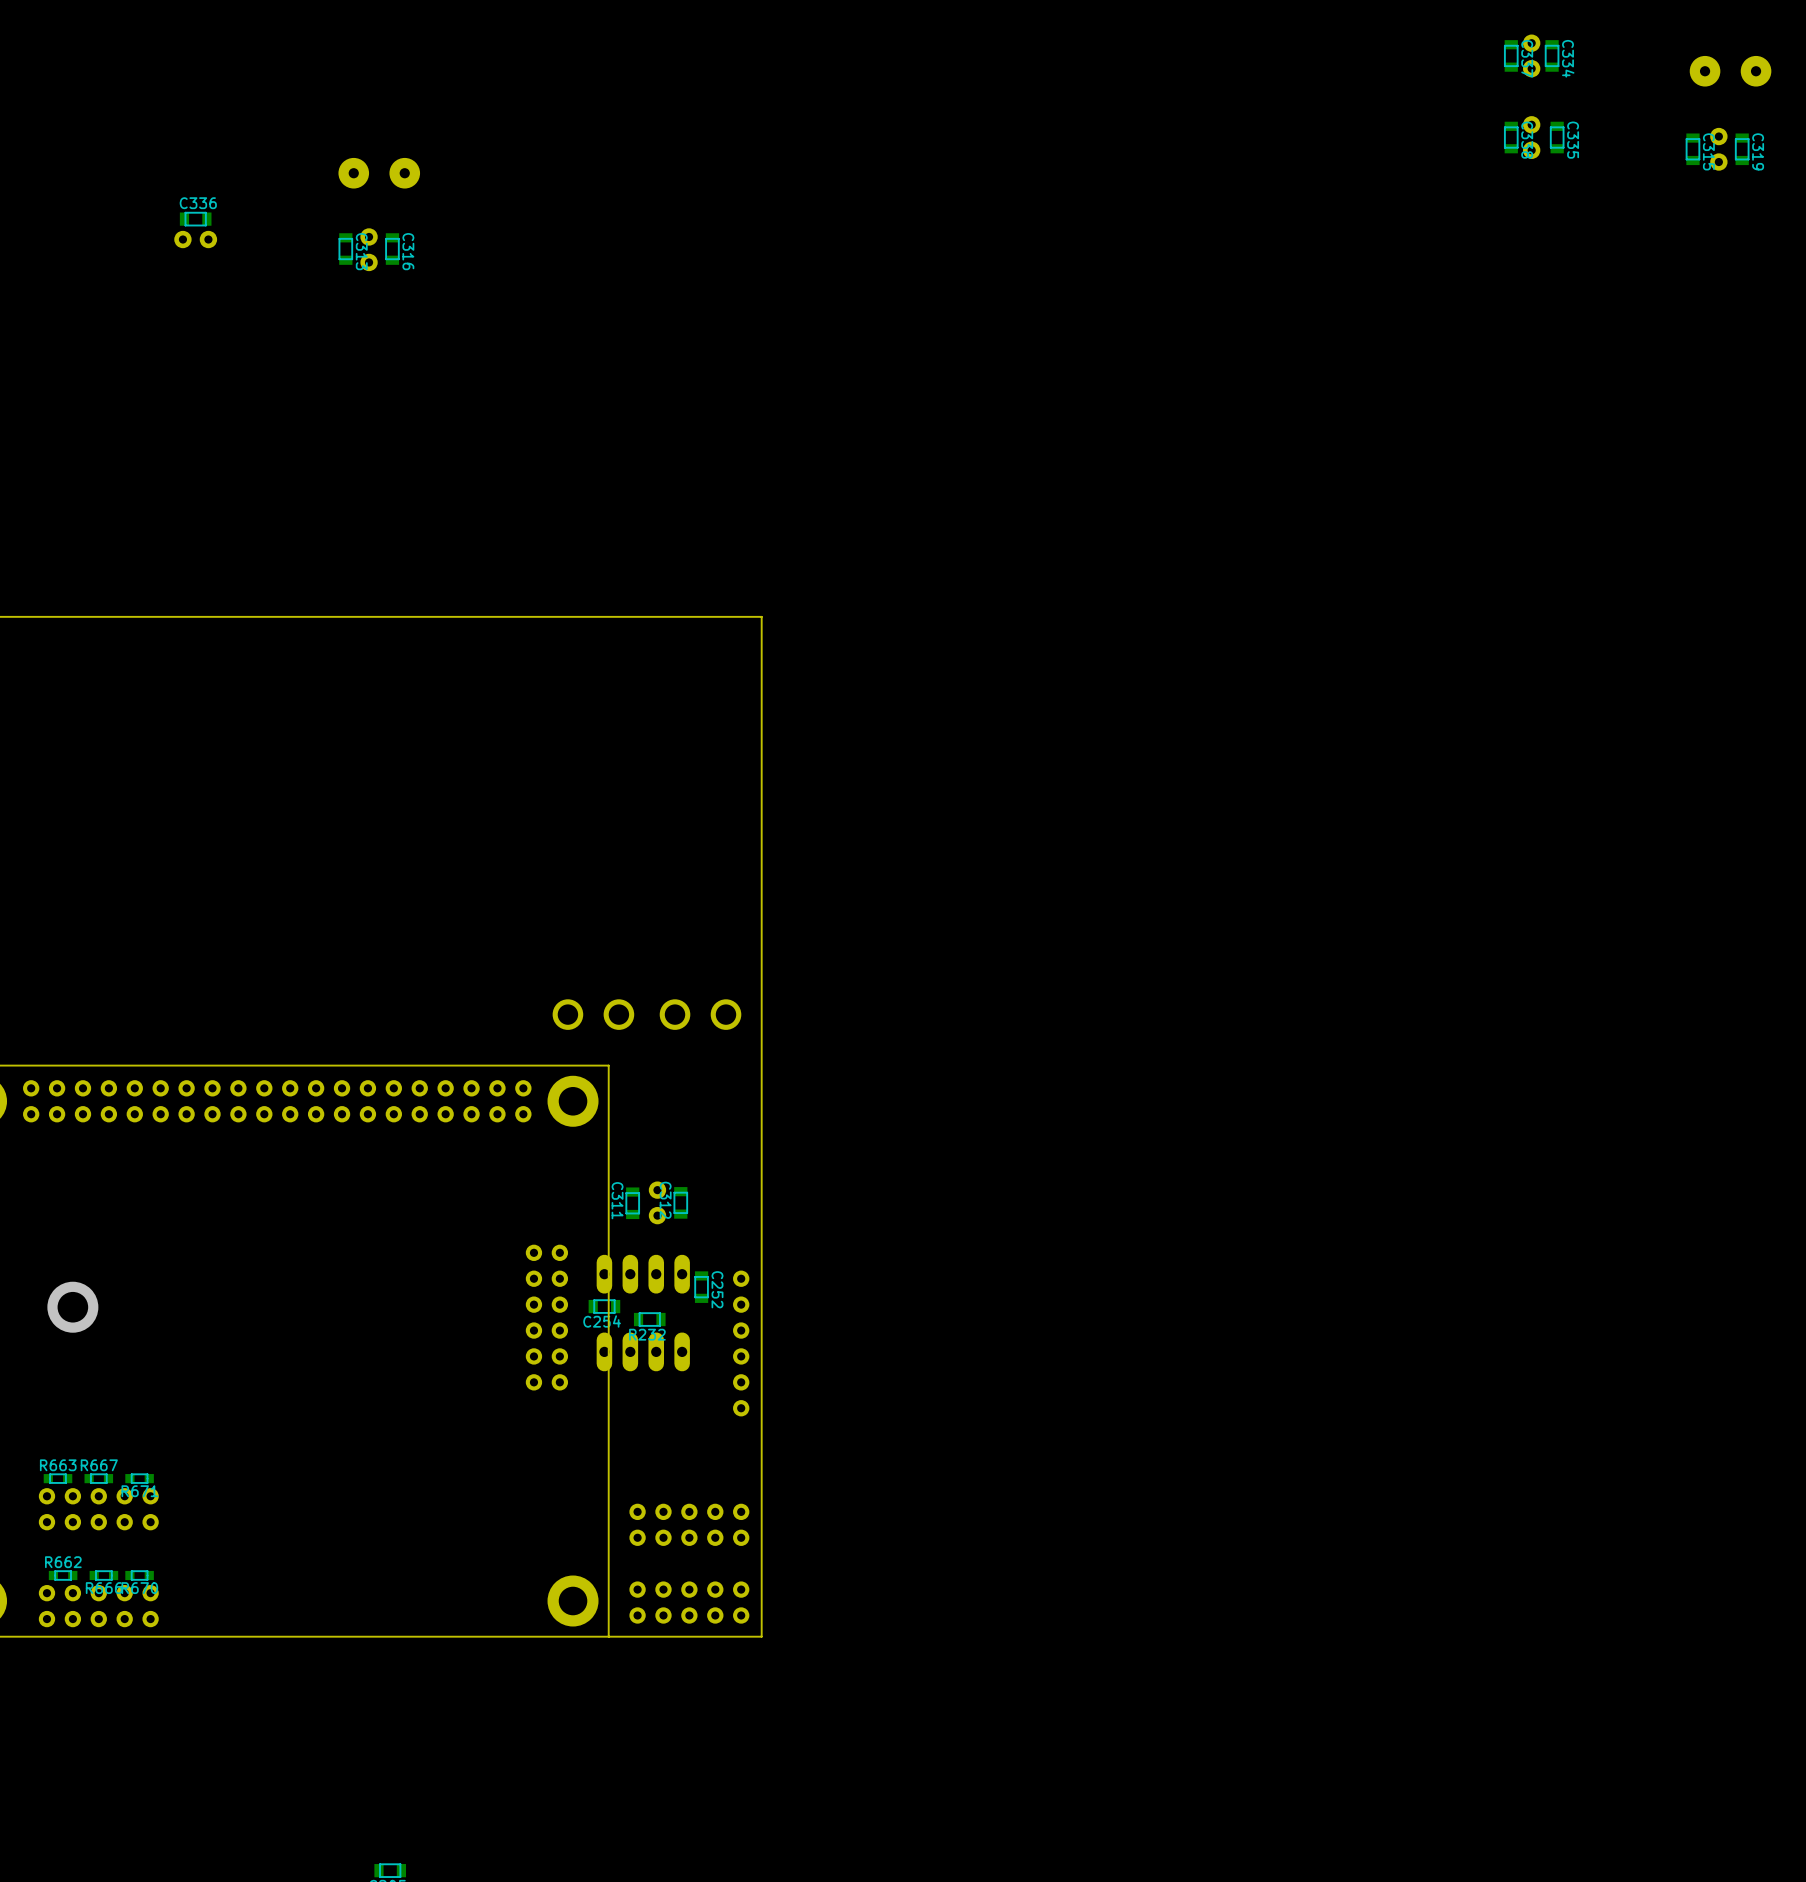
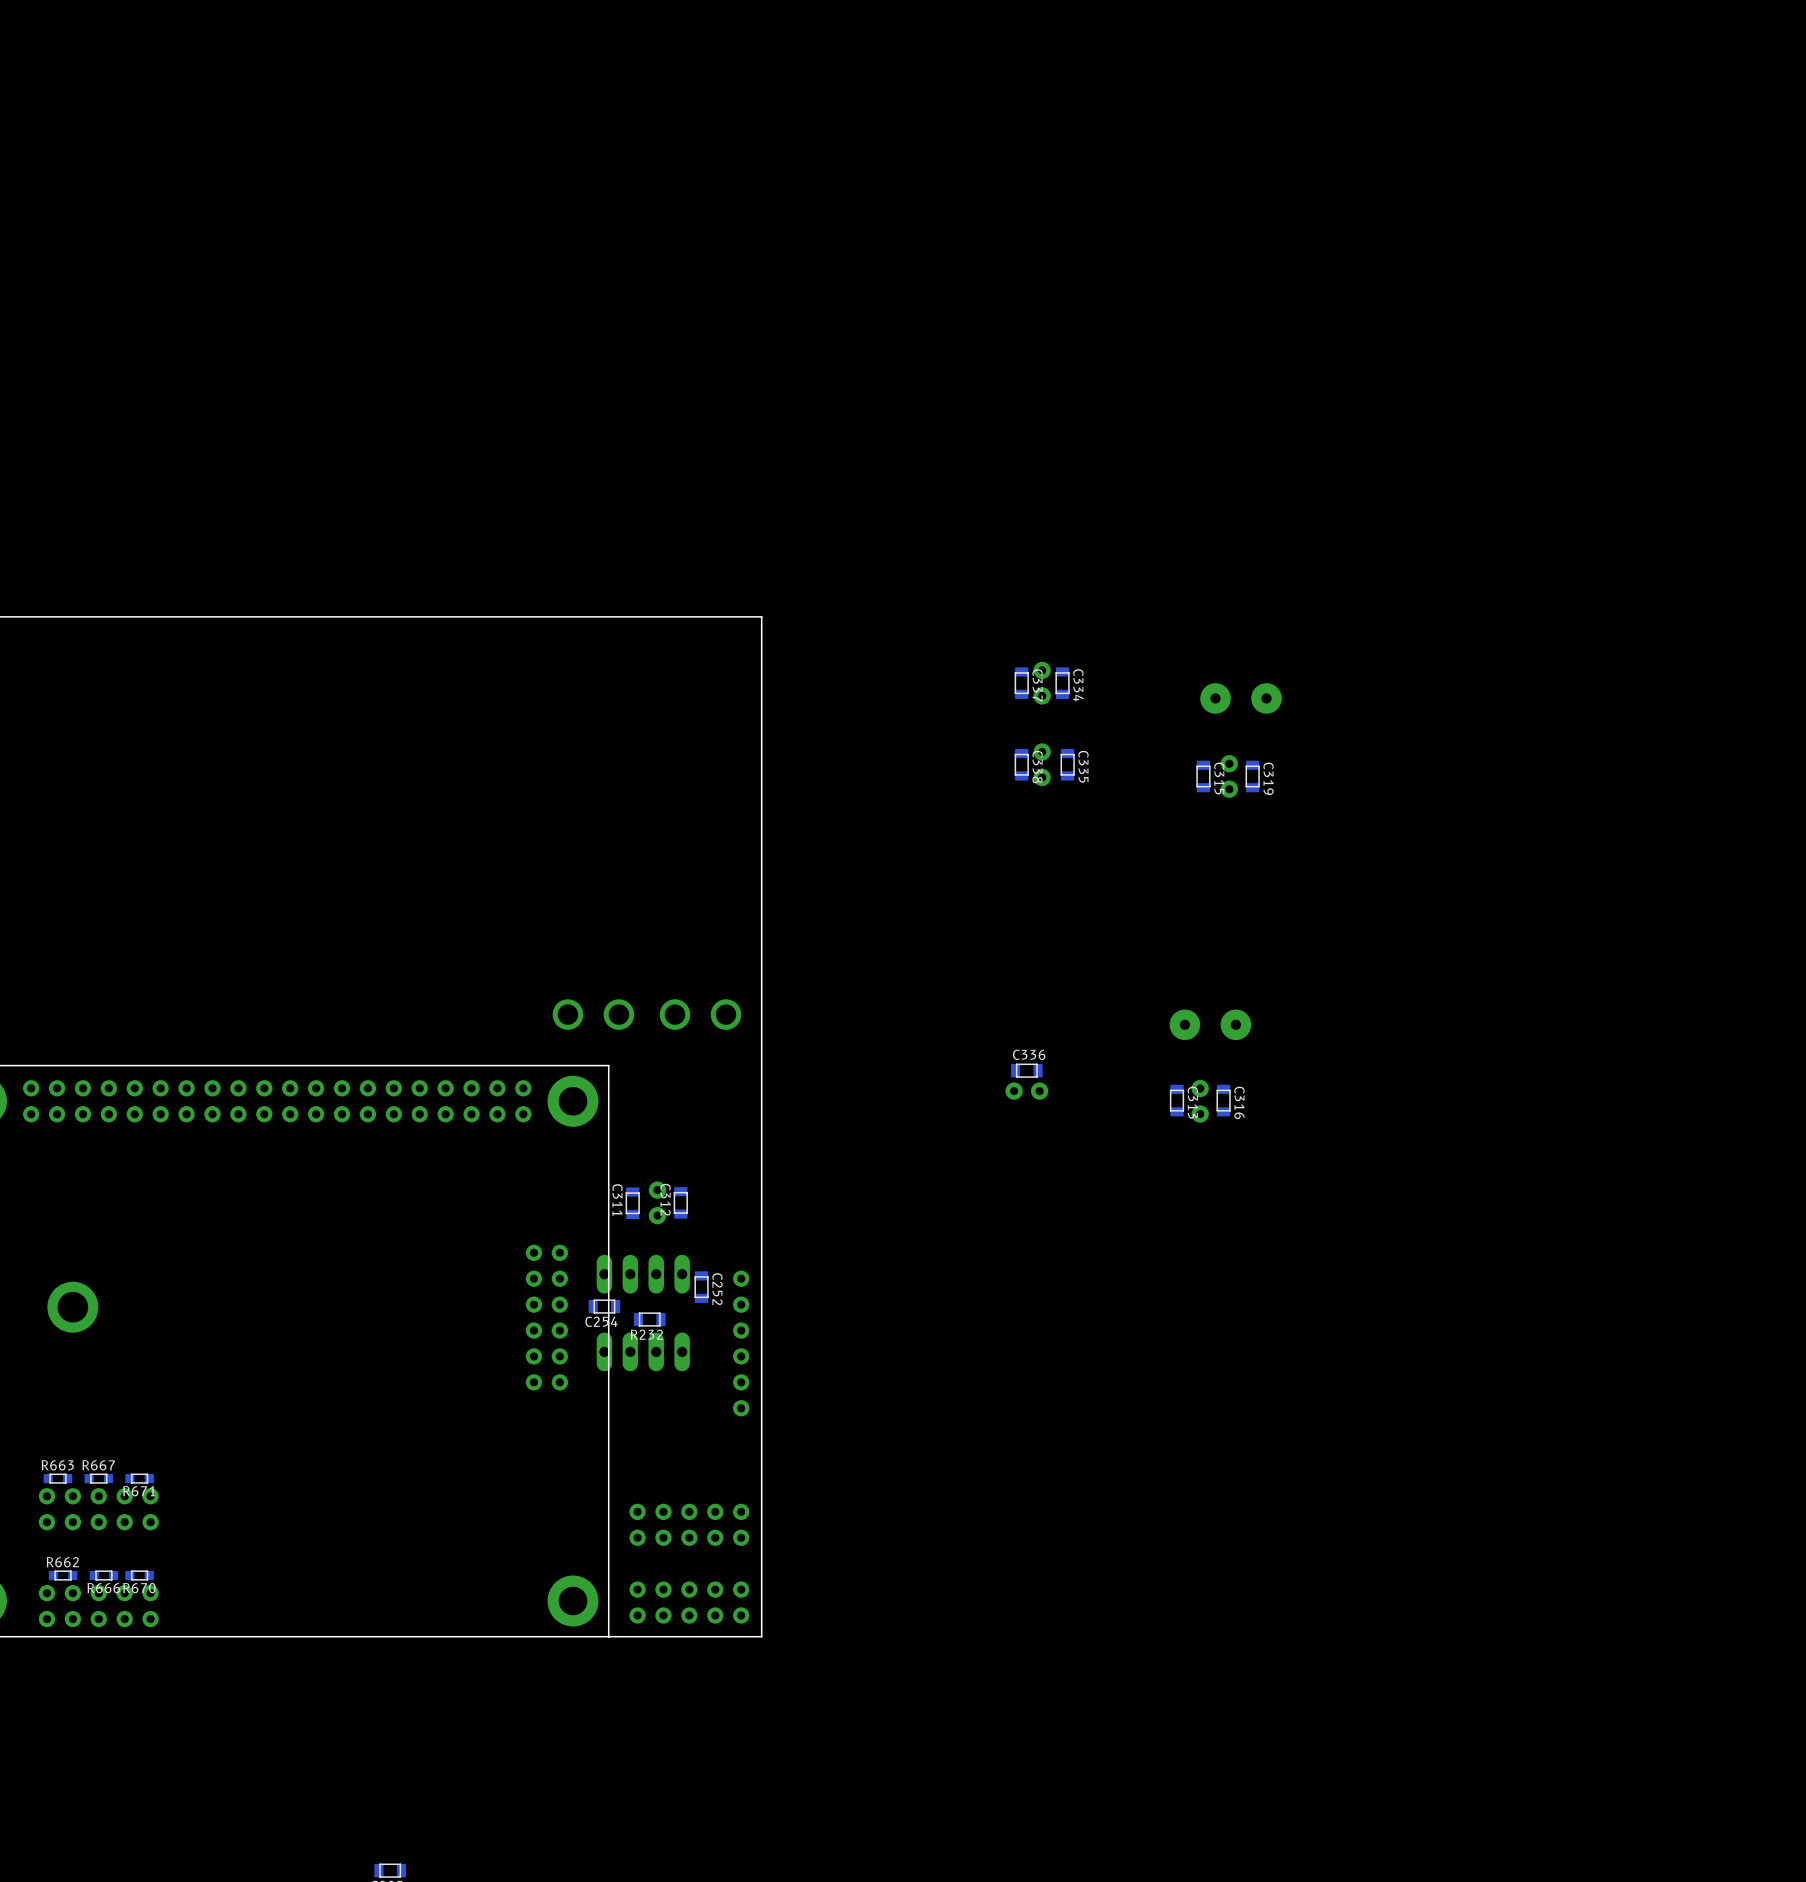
C337 position: (1511, 55) -> (1021, 683)
part: (1531, 55) -> none
C334 position: (1552, 55) -> (1062, 683)
part: (1730, 71) -> none
C338 position: (1511, 137) -> (1021, 764)
part: (1531, 137) -> none
C335 position: (1557, 137) -> (1067, 764)
C315 position: (1692, 149) -> (1203, 776)
part: (1718, 149) -> none
C319 position: (1742, 149) -> (1252, 776)
part: (379, 173) -> none
C336 position: (195, 219) -> (1026, 1070)
part: (195, 239) -> none
C313 position: (345, 249) -> (1176, 1100)
part: (369, 249) -> none
C316 position: (392, 249) -> (1223, 1100)
part: none -> (1042, 683)
part: none -> (1241, 698)
part: none -> (1042, 764)
part: none -> (1229, 776)
part: none -> (1210, 1024)
part: none -> (1026, 1091)
part: none -> (1200, 1101)

